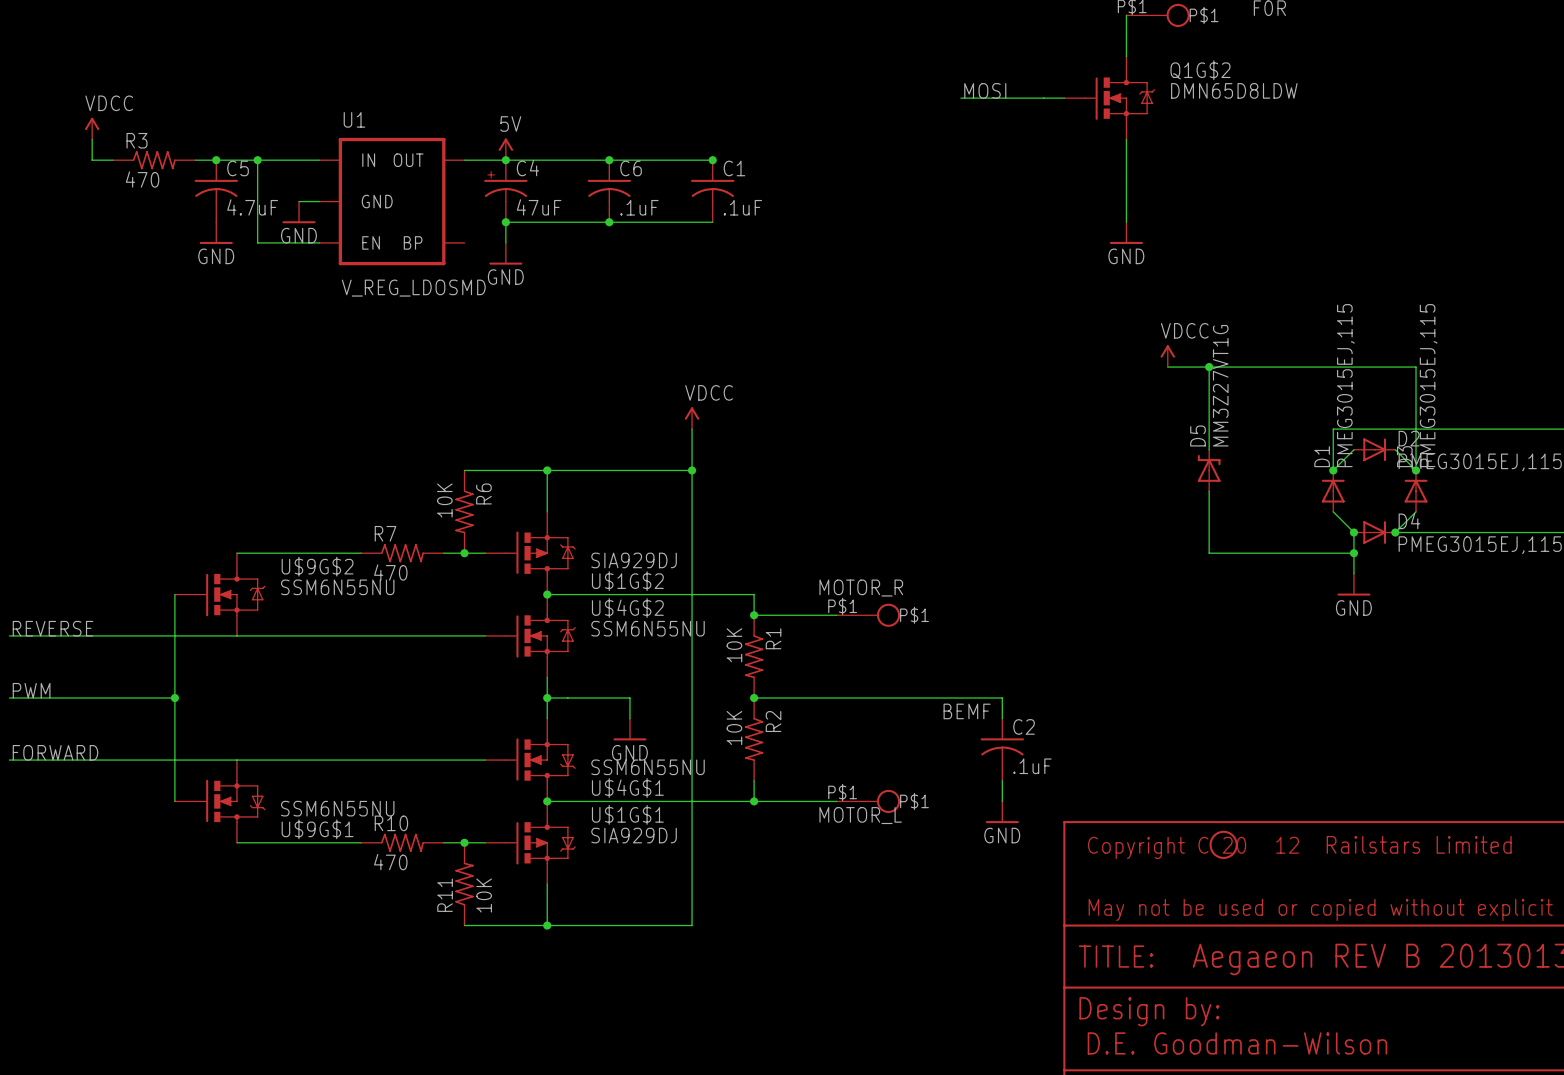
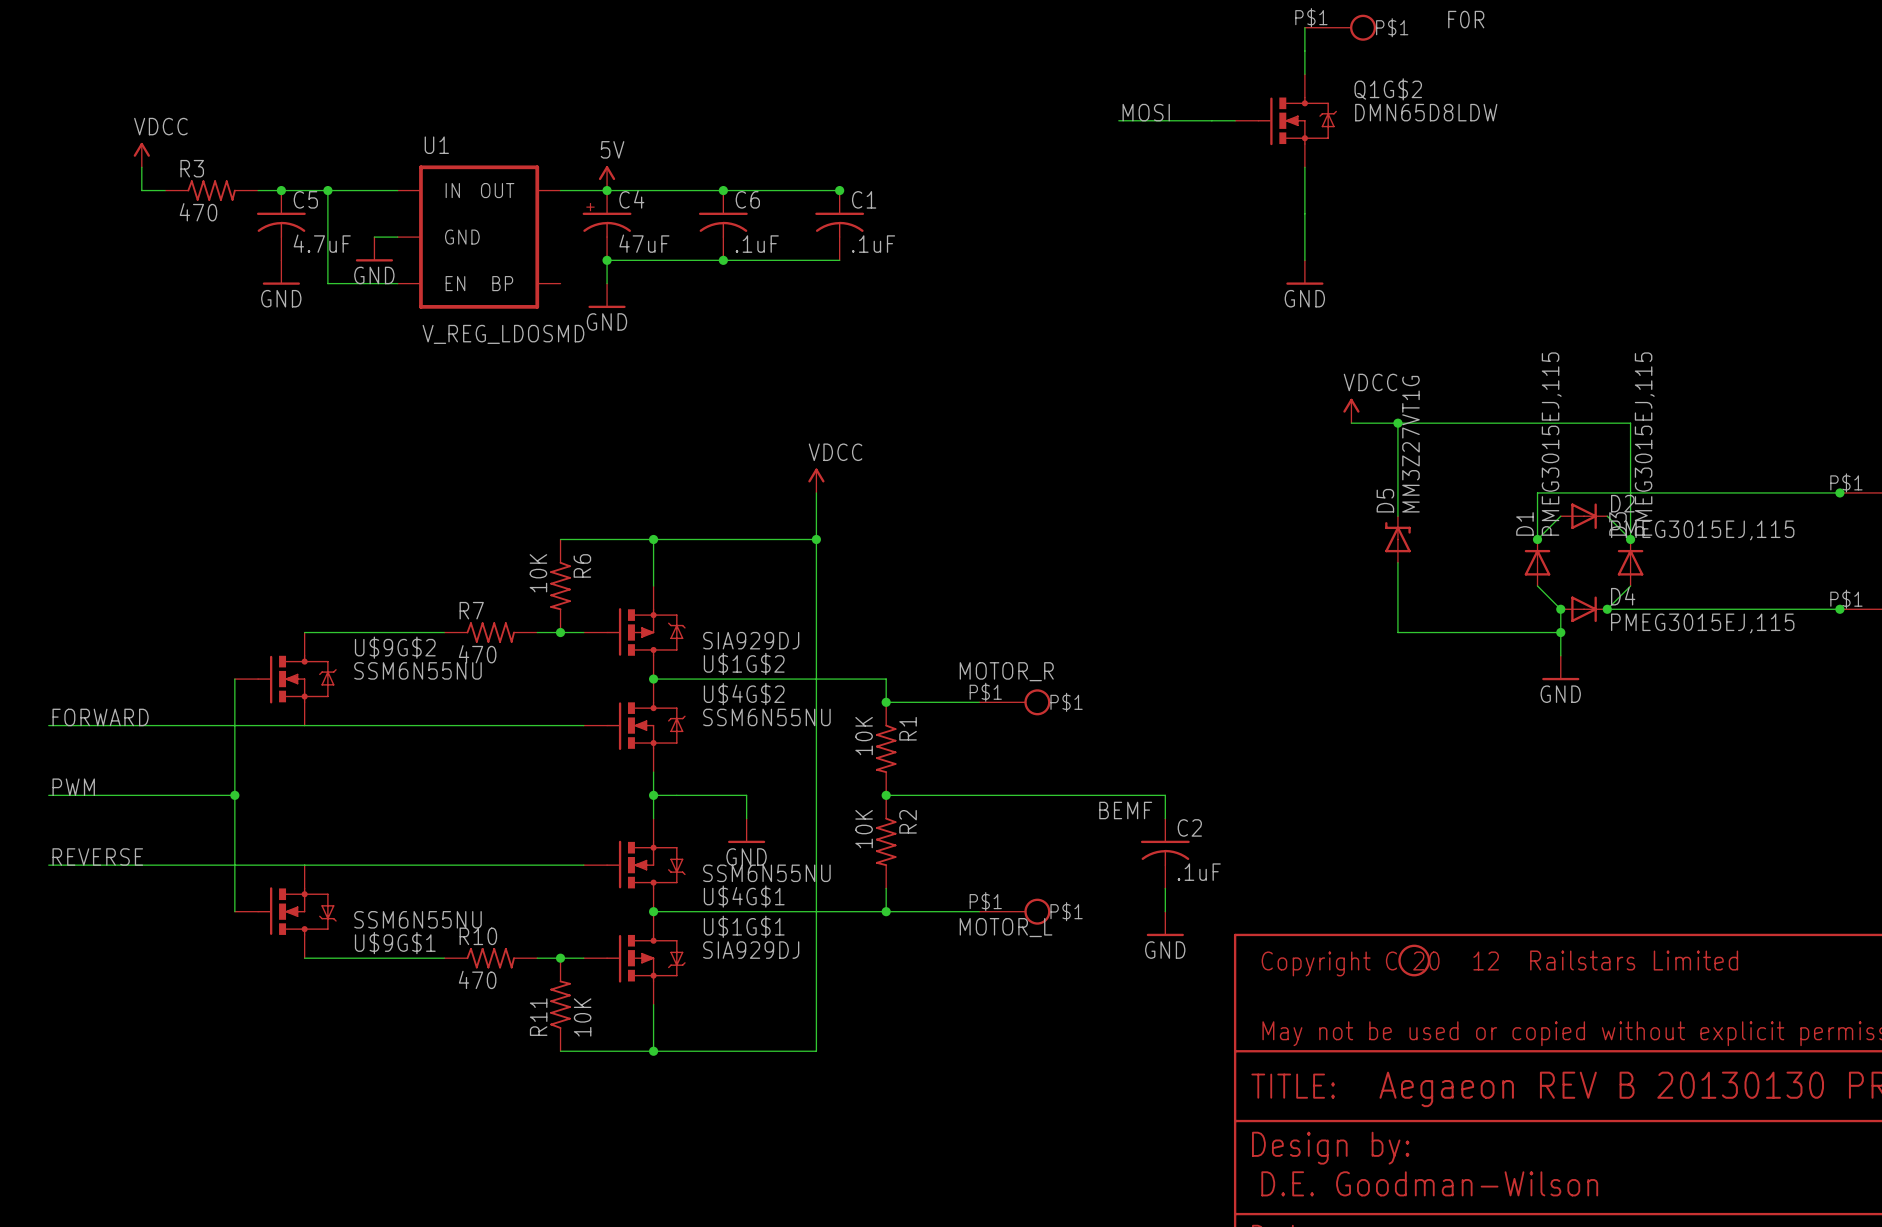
label: REVERSE (53, 628) -> FORWARD (100, 717)
label: FORWARD (55, 752) -> REVERSE (97, 857)

